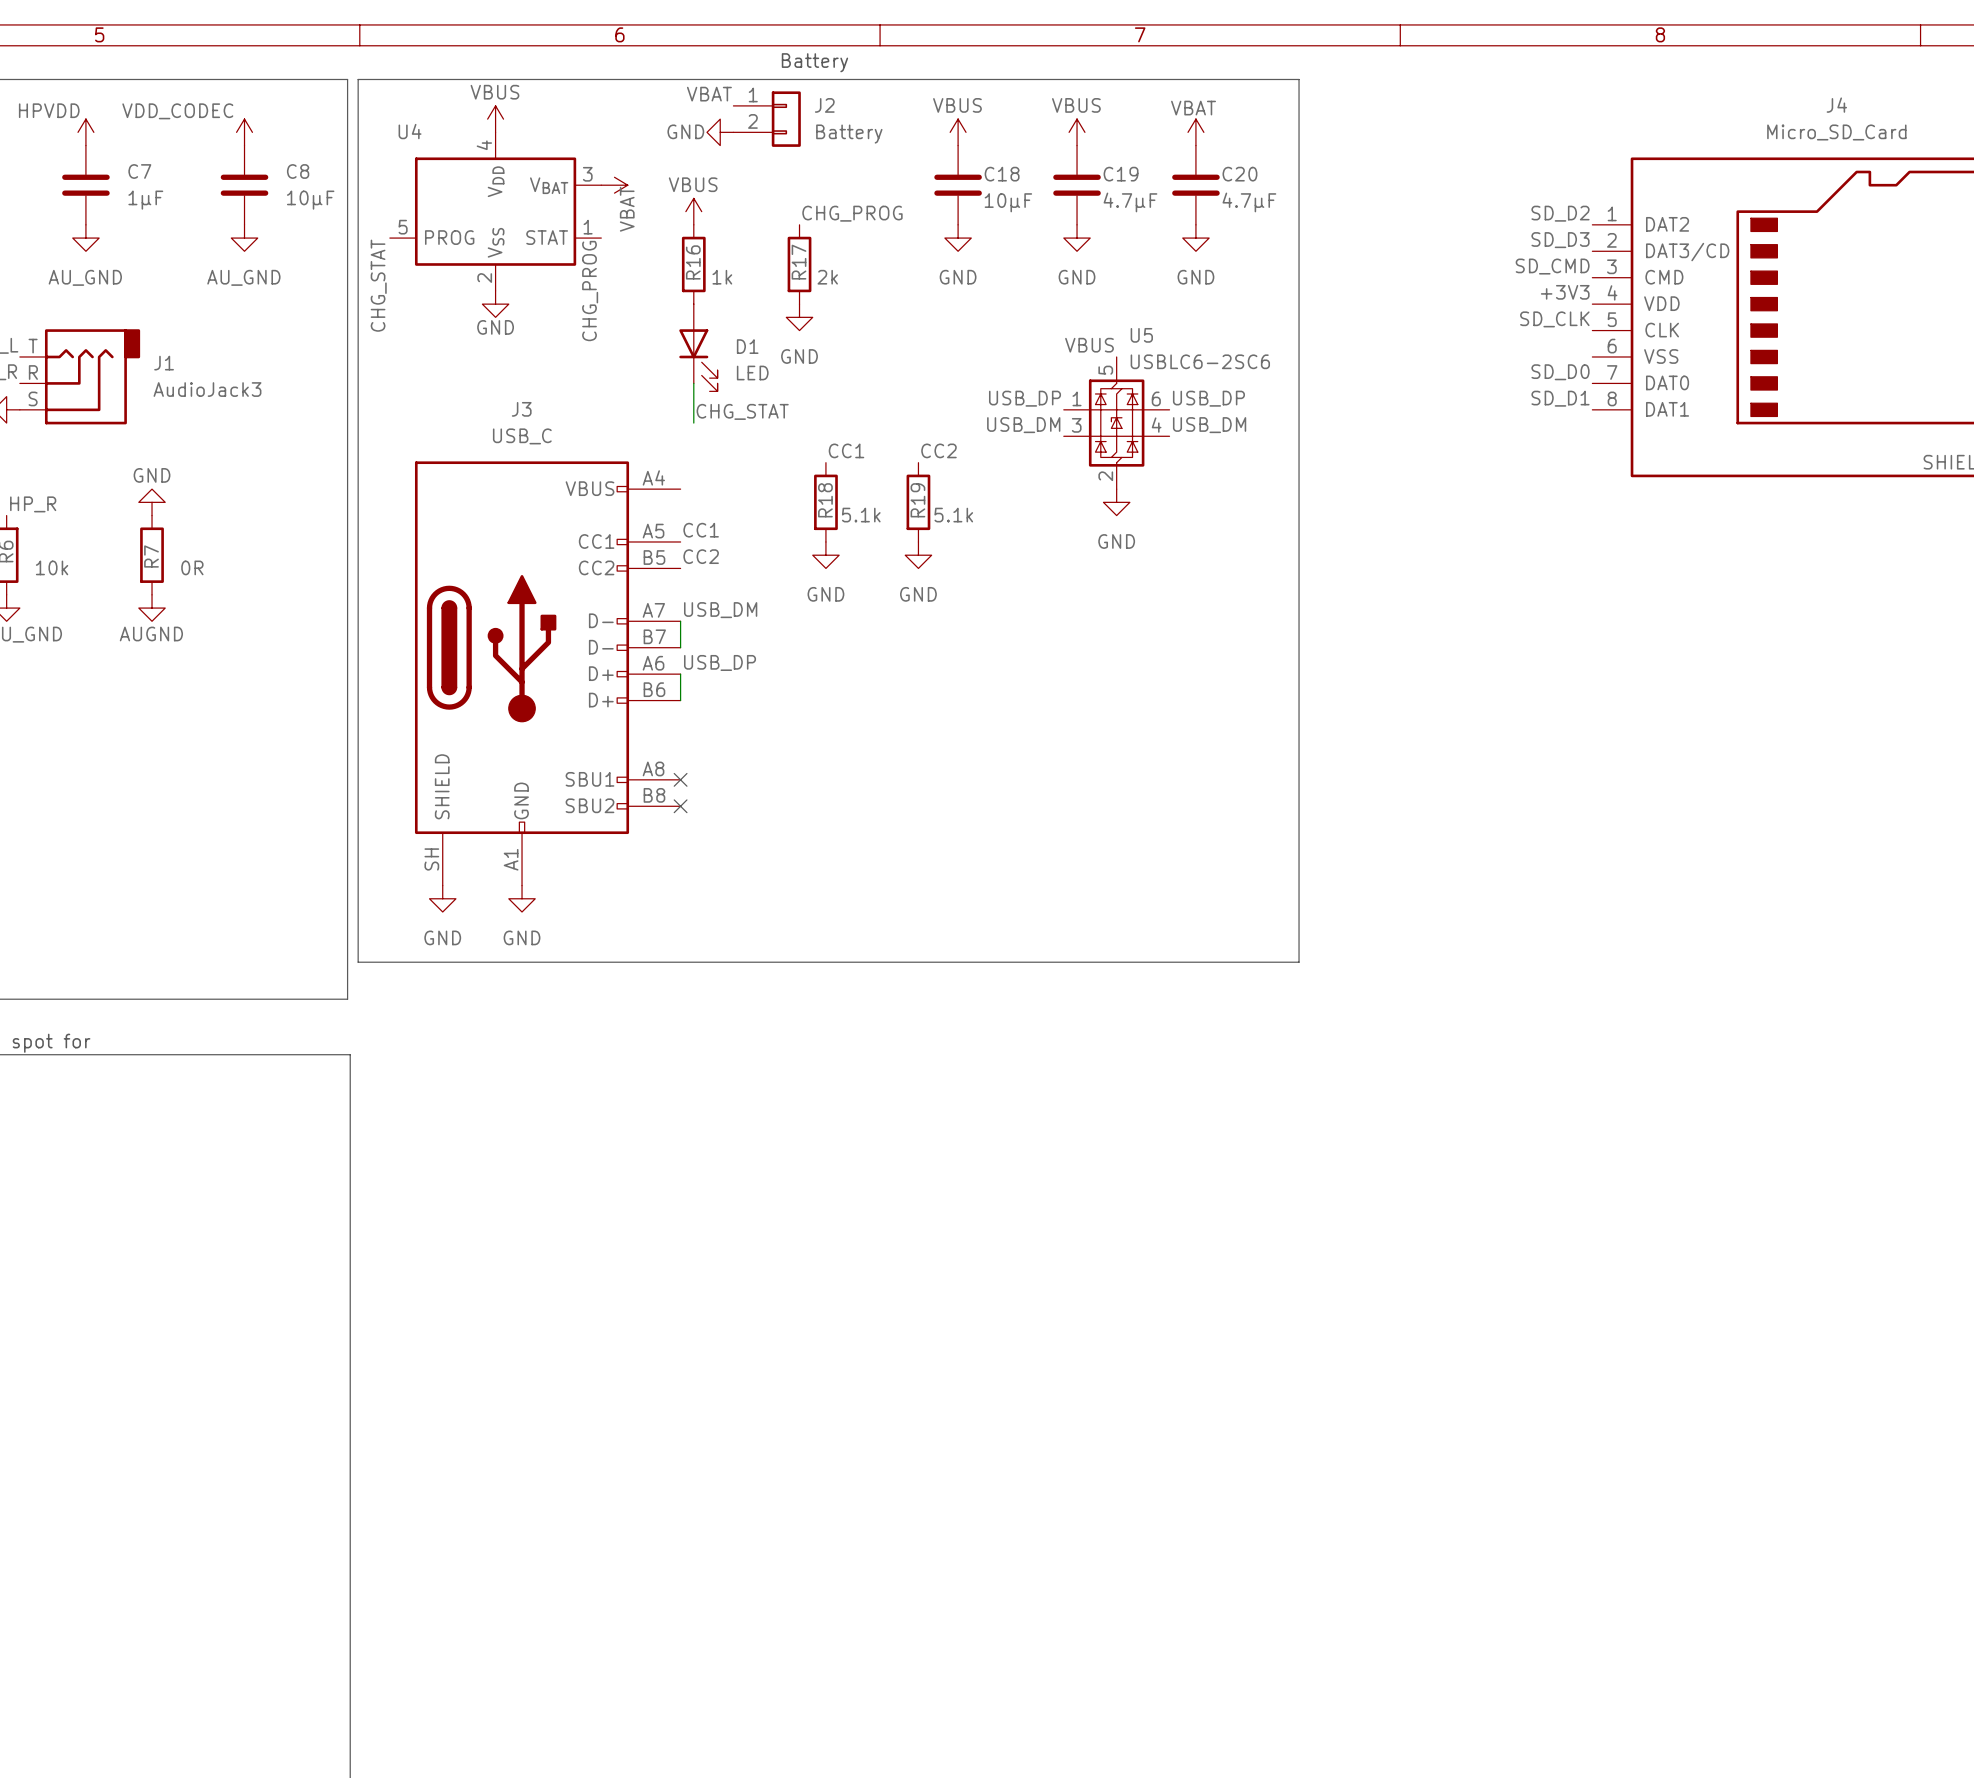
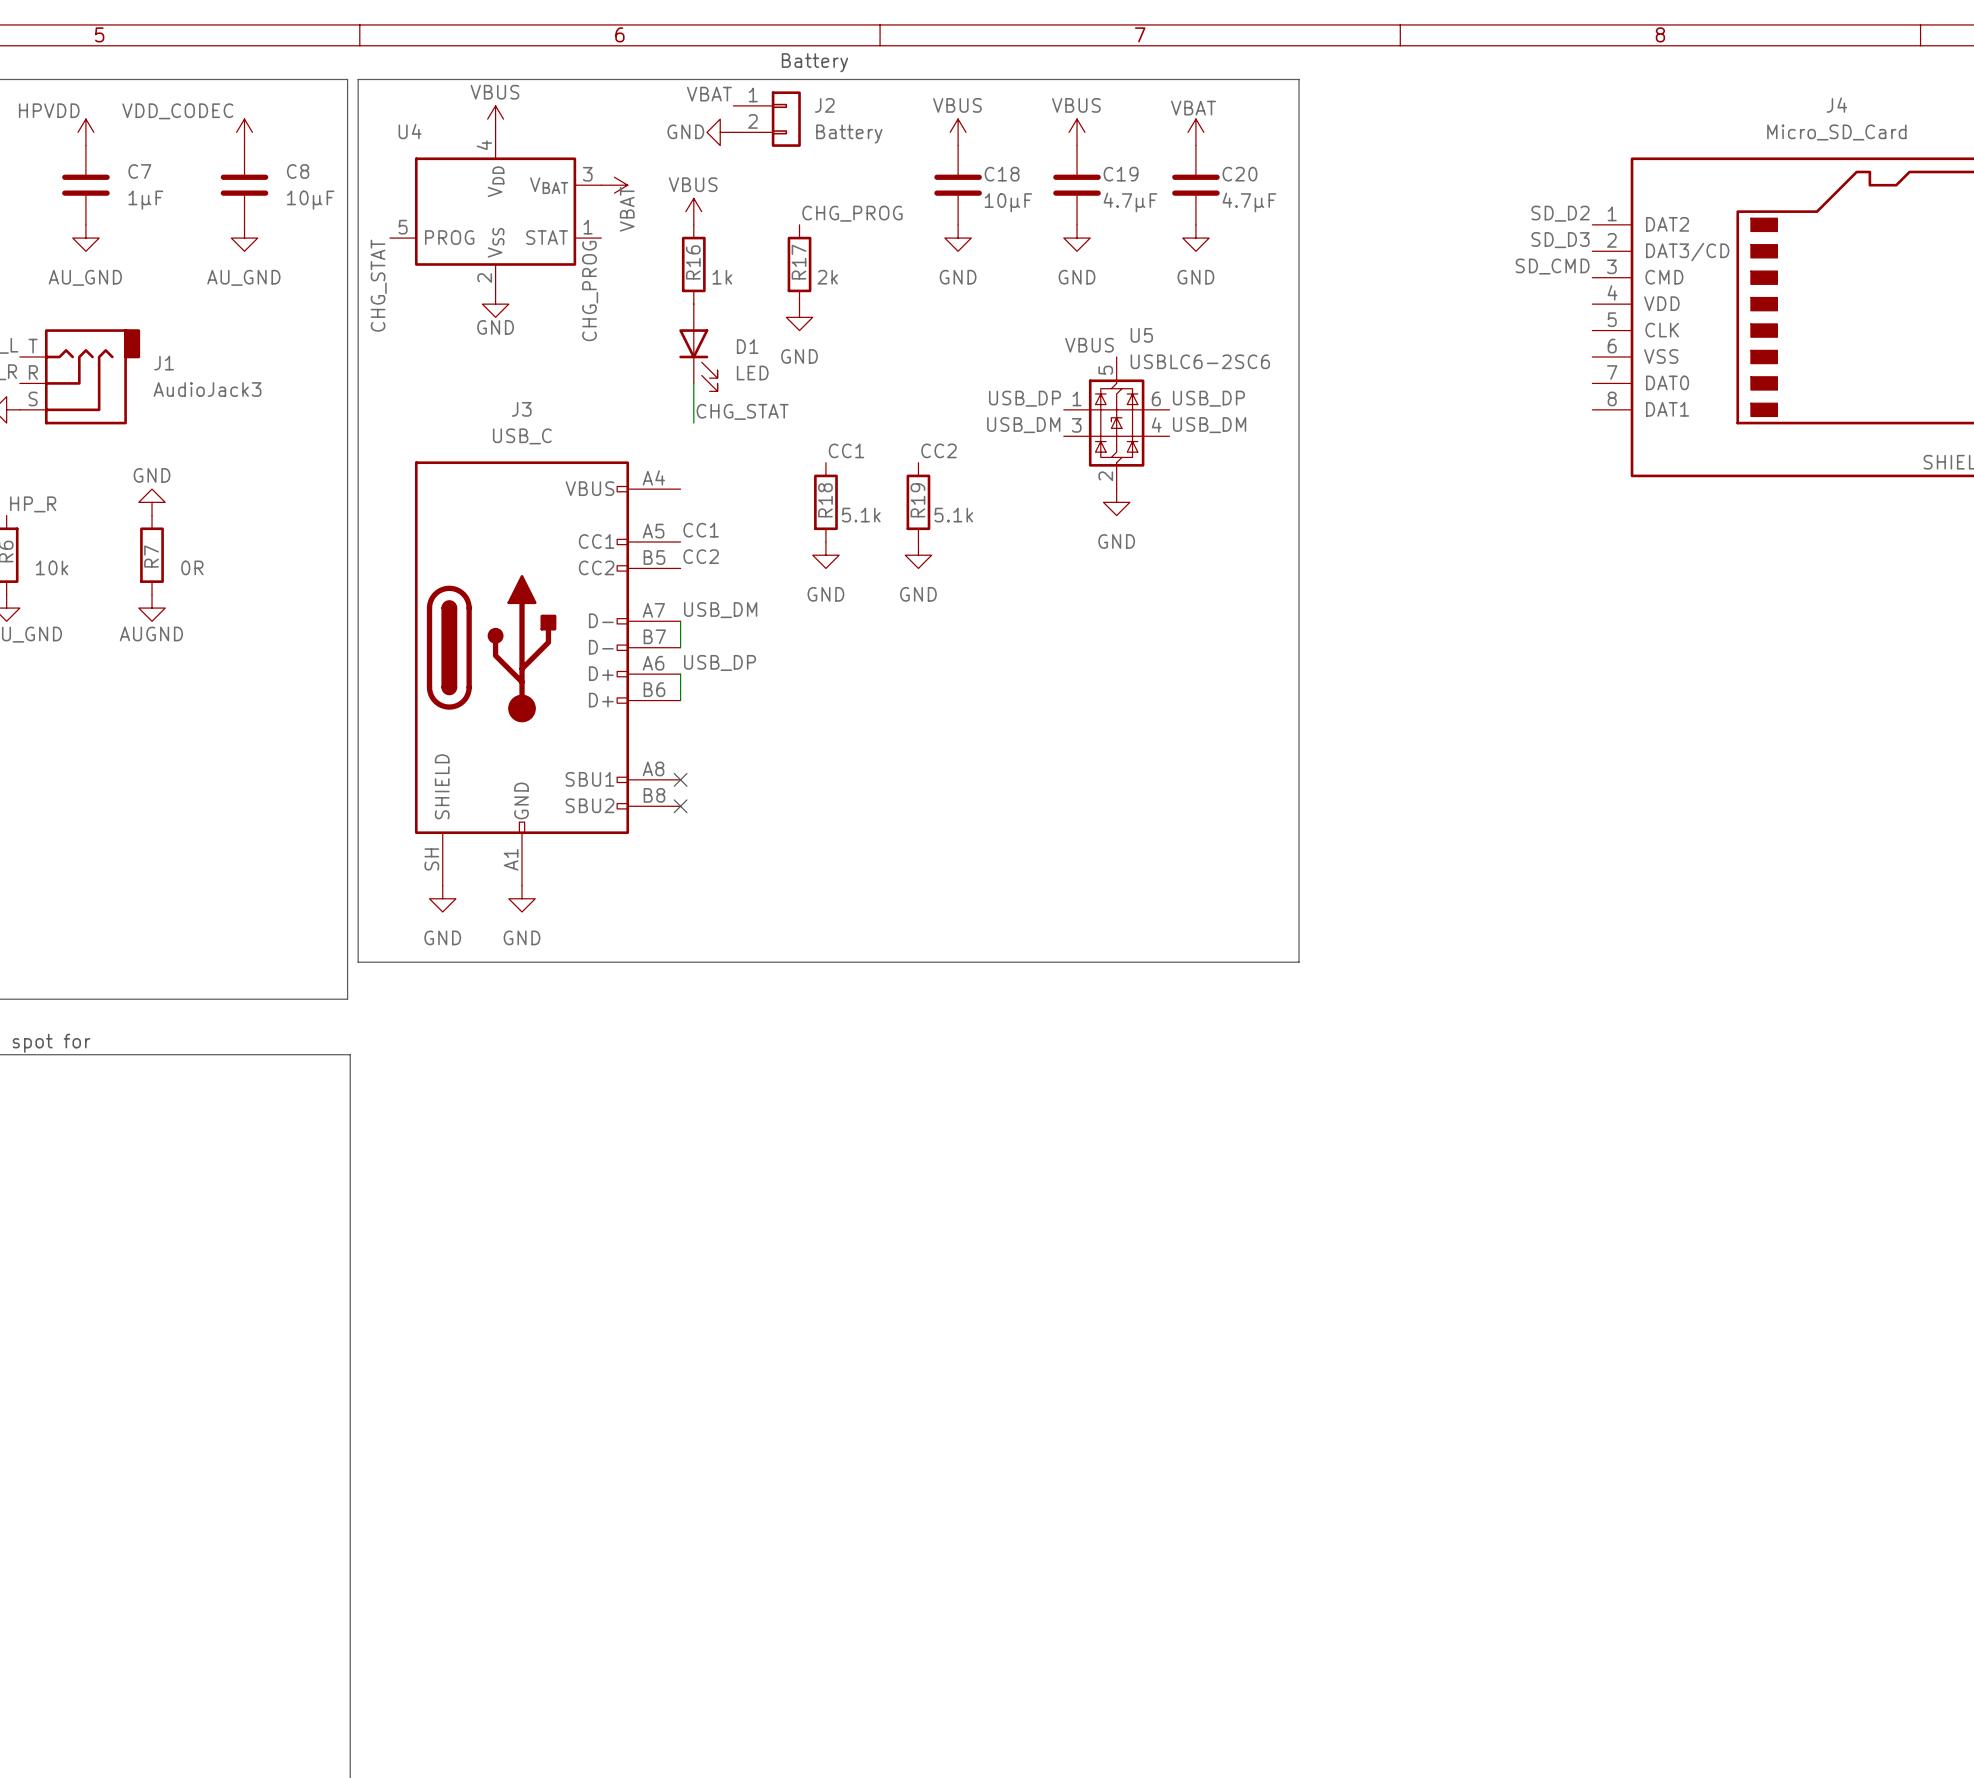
label: +3V3 (1565, 292) -> none
label: SD_CLK (1554, 319) -> none
label: SD_D0 (1560, 372) -> none
label: SD_D1 (1560, 398) -> none

